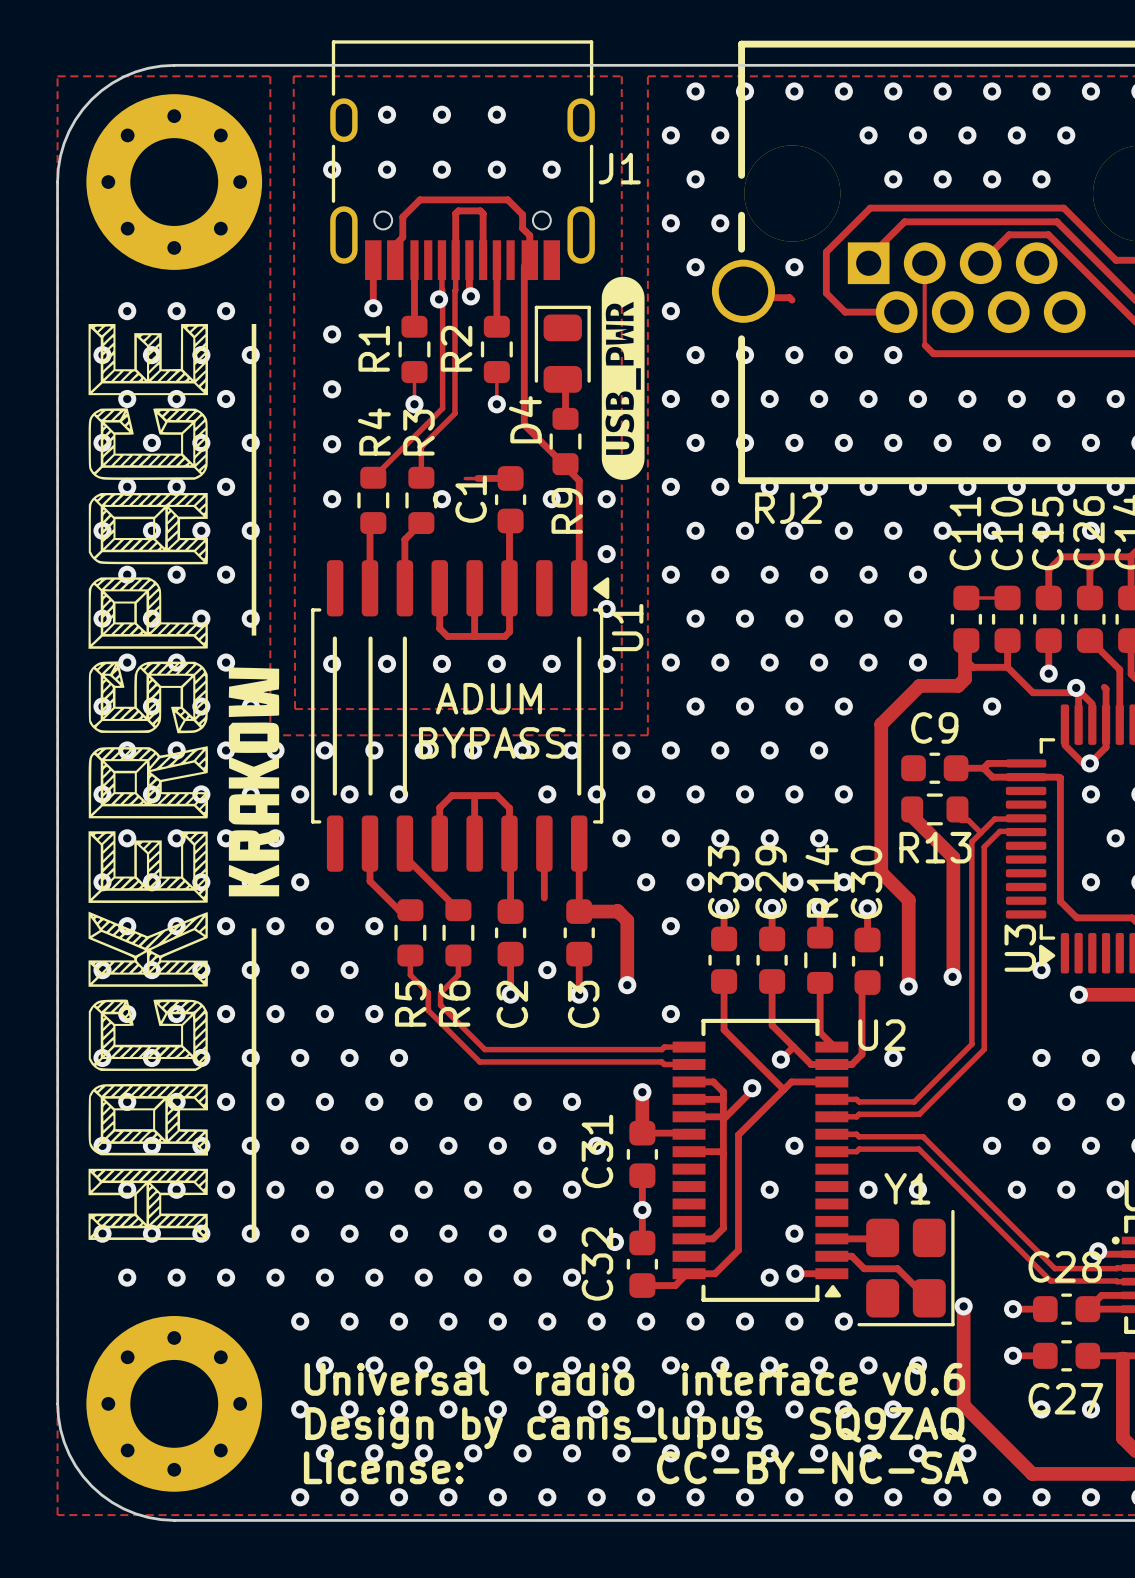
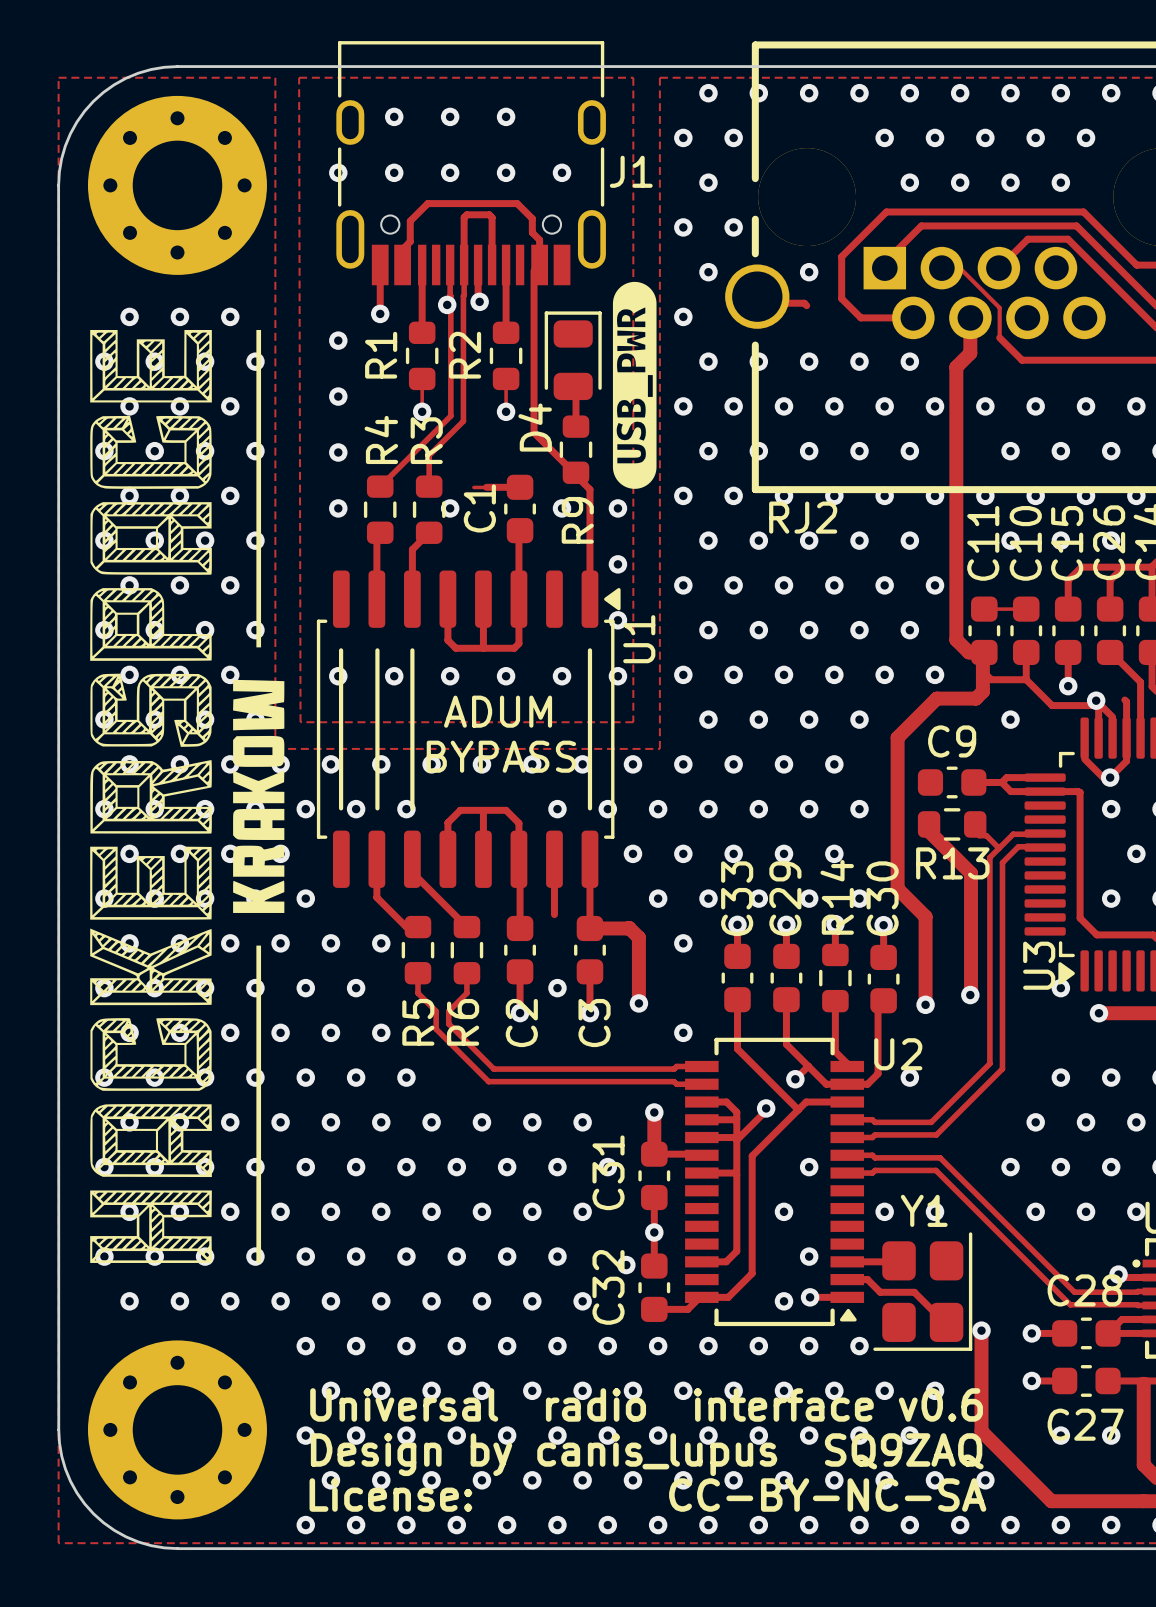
track: (924, 264) (924, 344) (933, 353) (1003, 353) -> (941, 268) (959, 268) (999, 307) (999, 337) (1022, 360)
track: none -> (970, 317) (970, 353) (956, 367) (956, 639) (968, 652) (984, 652)
via: (942, 442) -> none
via: (942, 530) -> none

